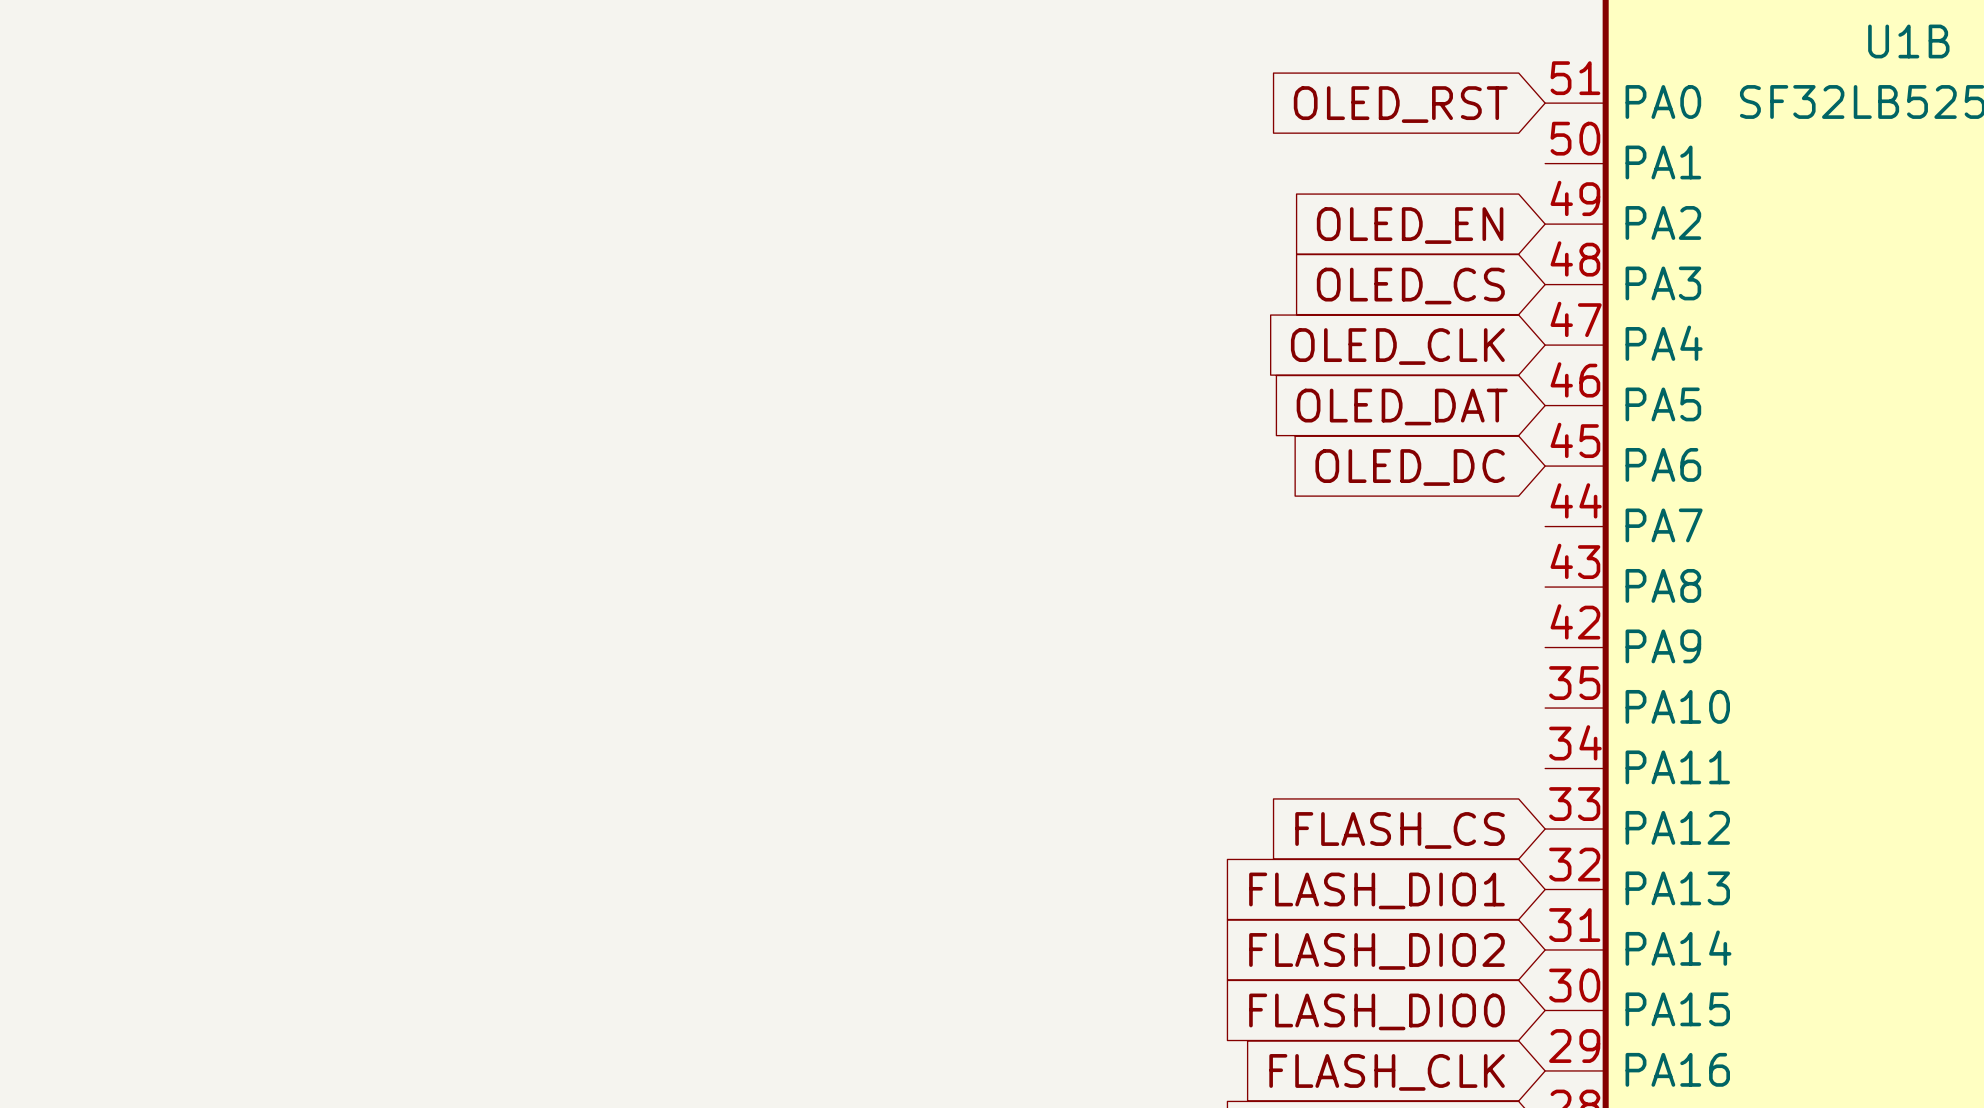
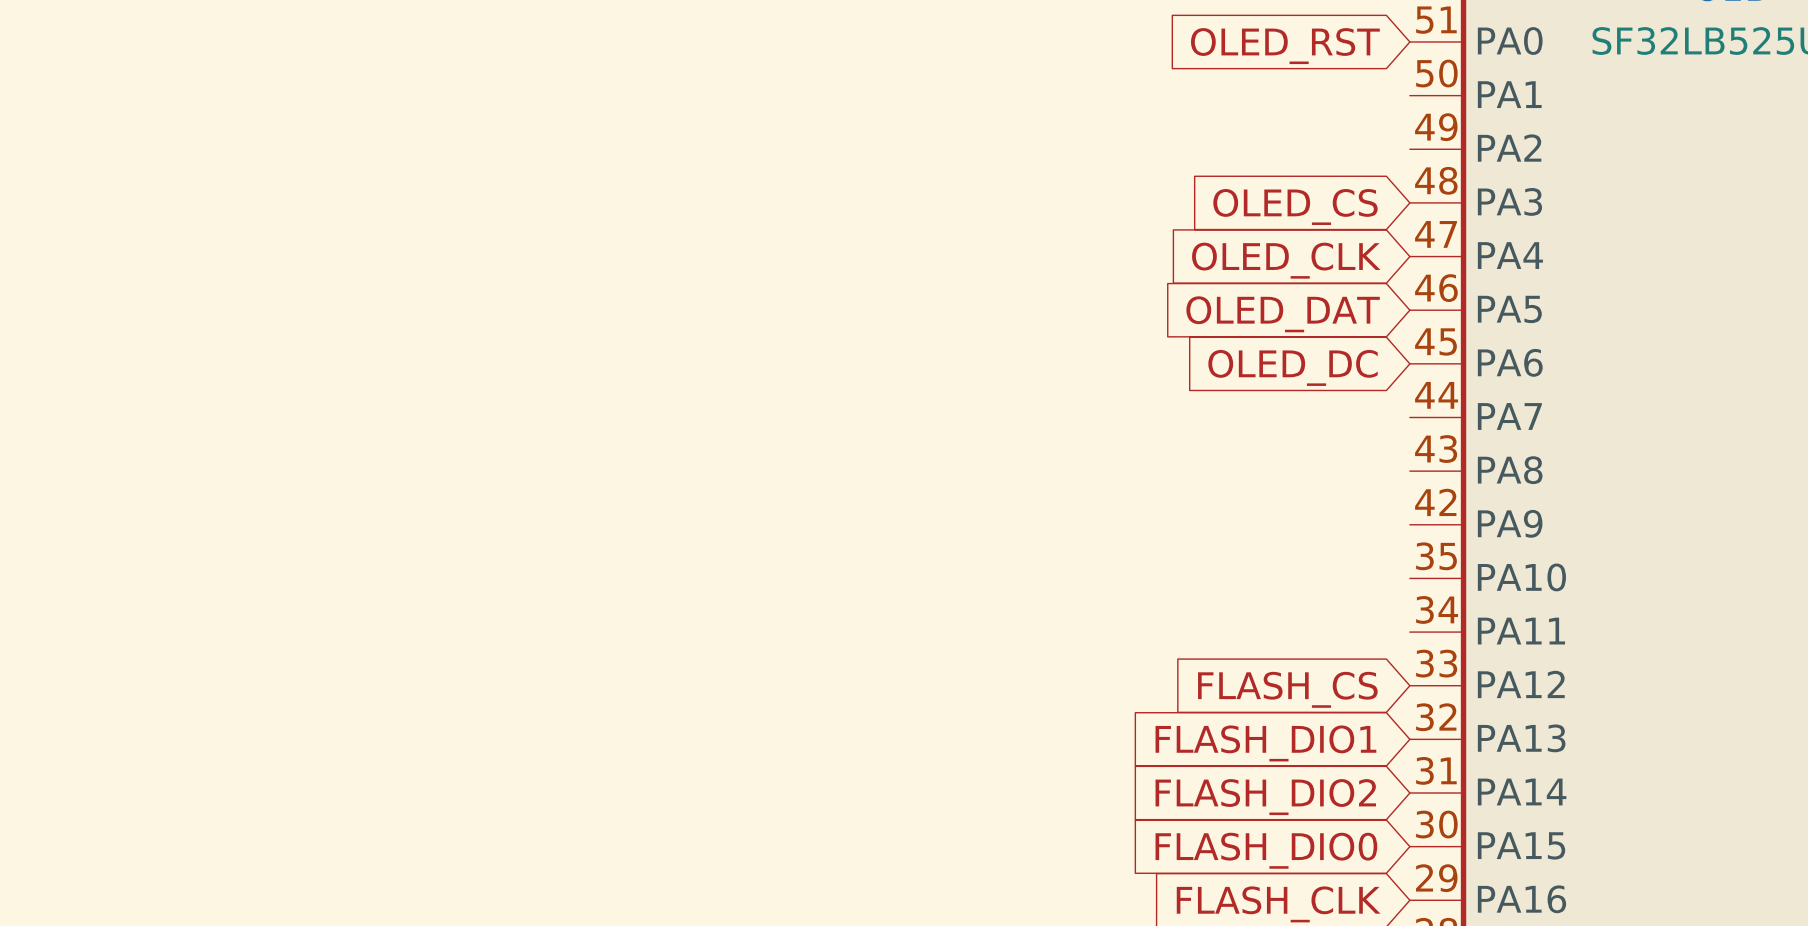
global label: OLED_EN (1410, 225) -> none

